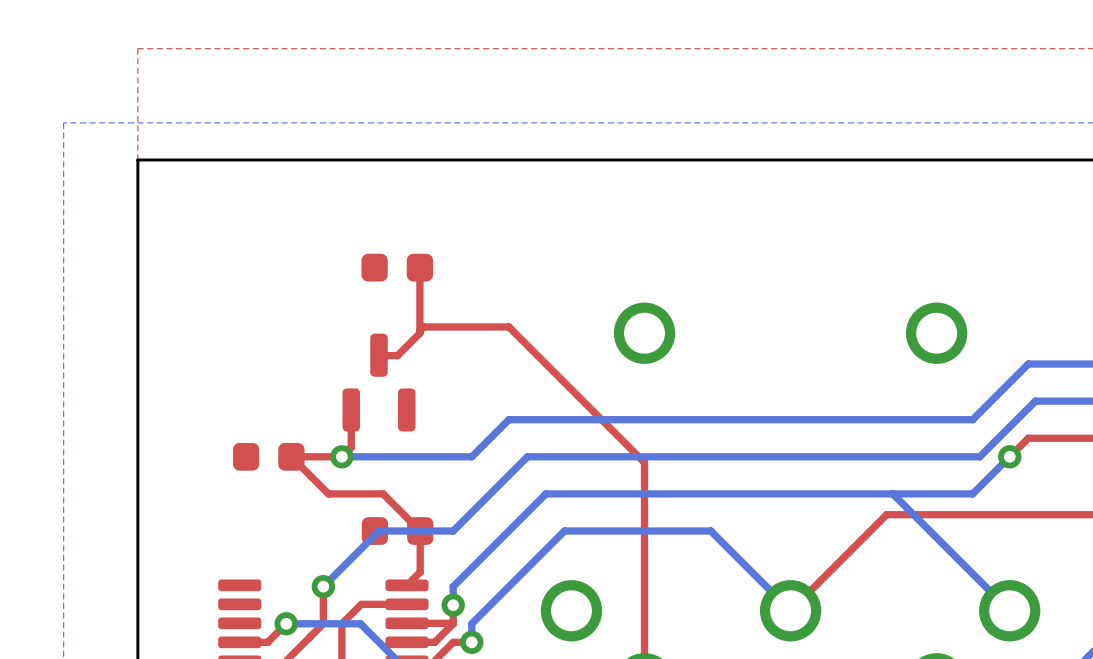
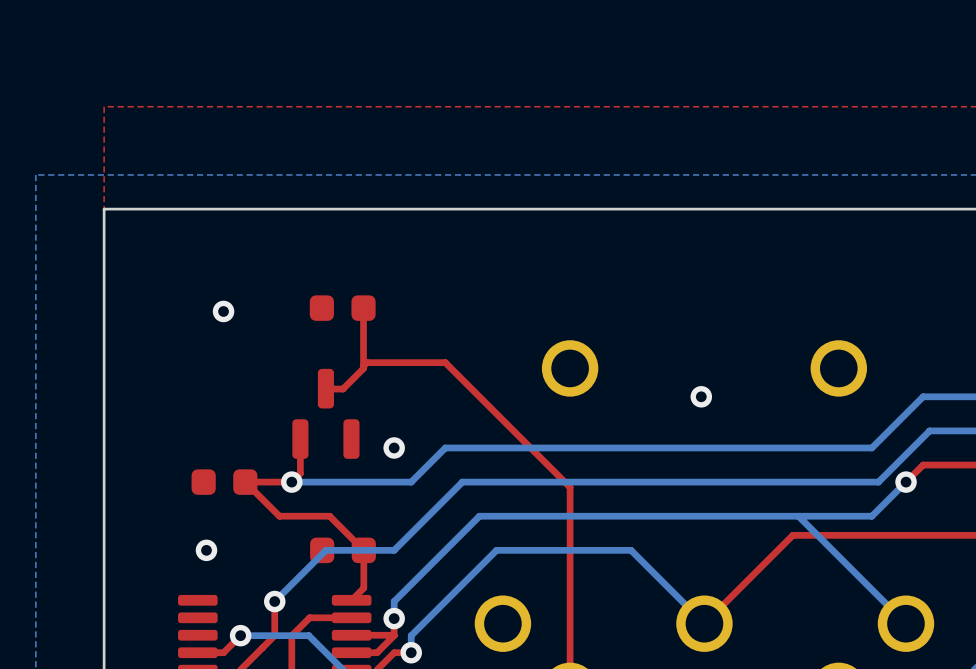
via: none -> (223, 311)
via: none -> (701, 396)
via: none -> (394, 447)
via: none -> (206, 550)

